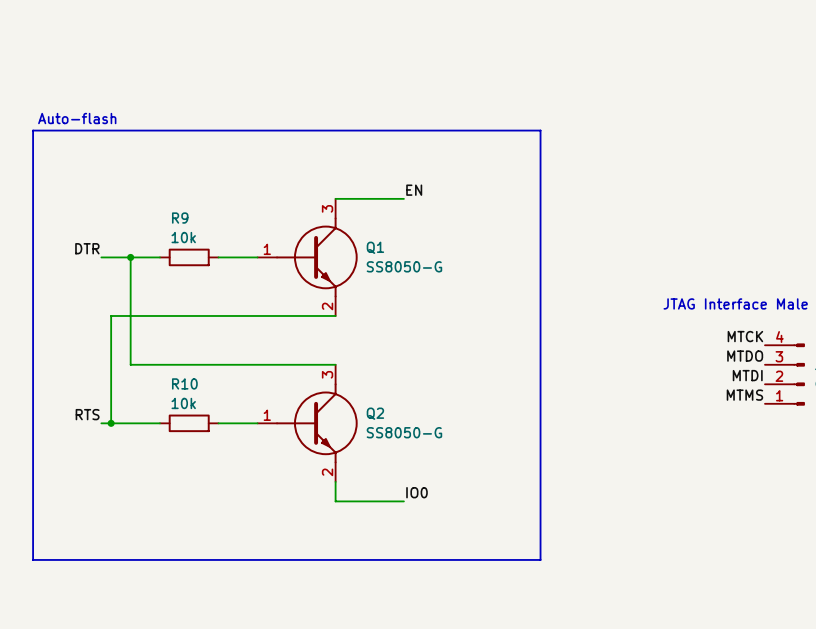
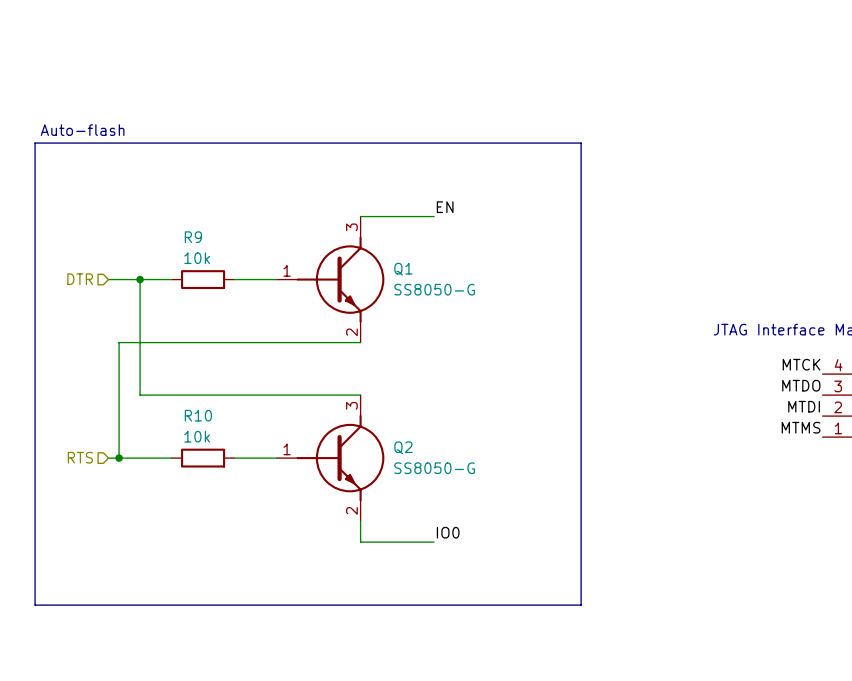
label: DTR (87, 248) -> none
hierarchical label: none -> DTR (80, 279)
label: RTS (87, 414) -> none
hierarchical label: none -> RTS (80, 457)

